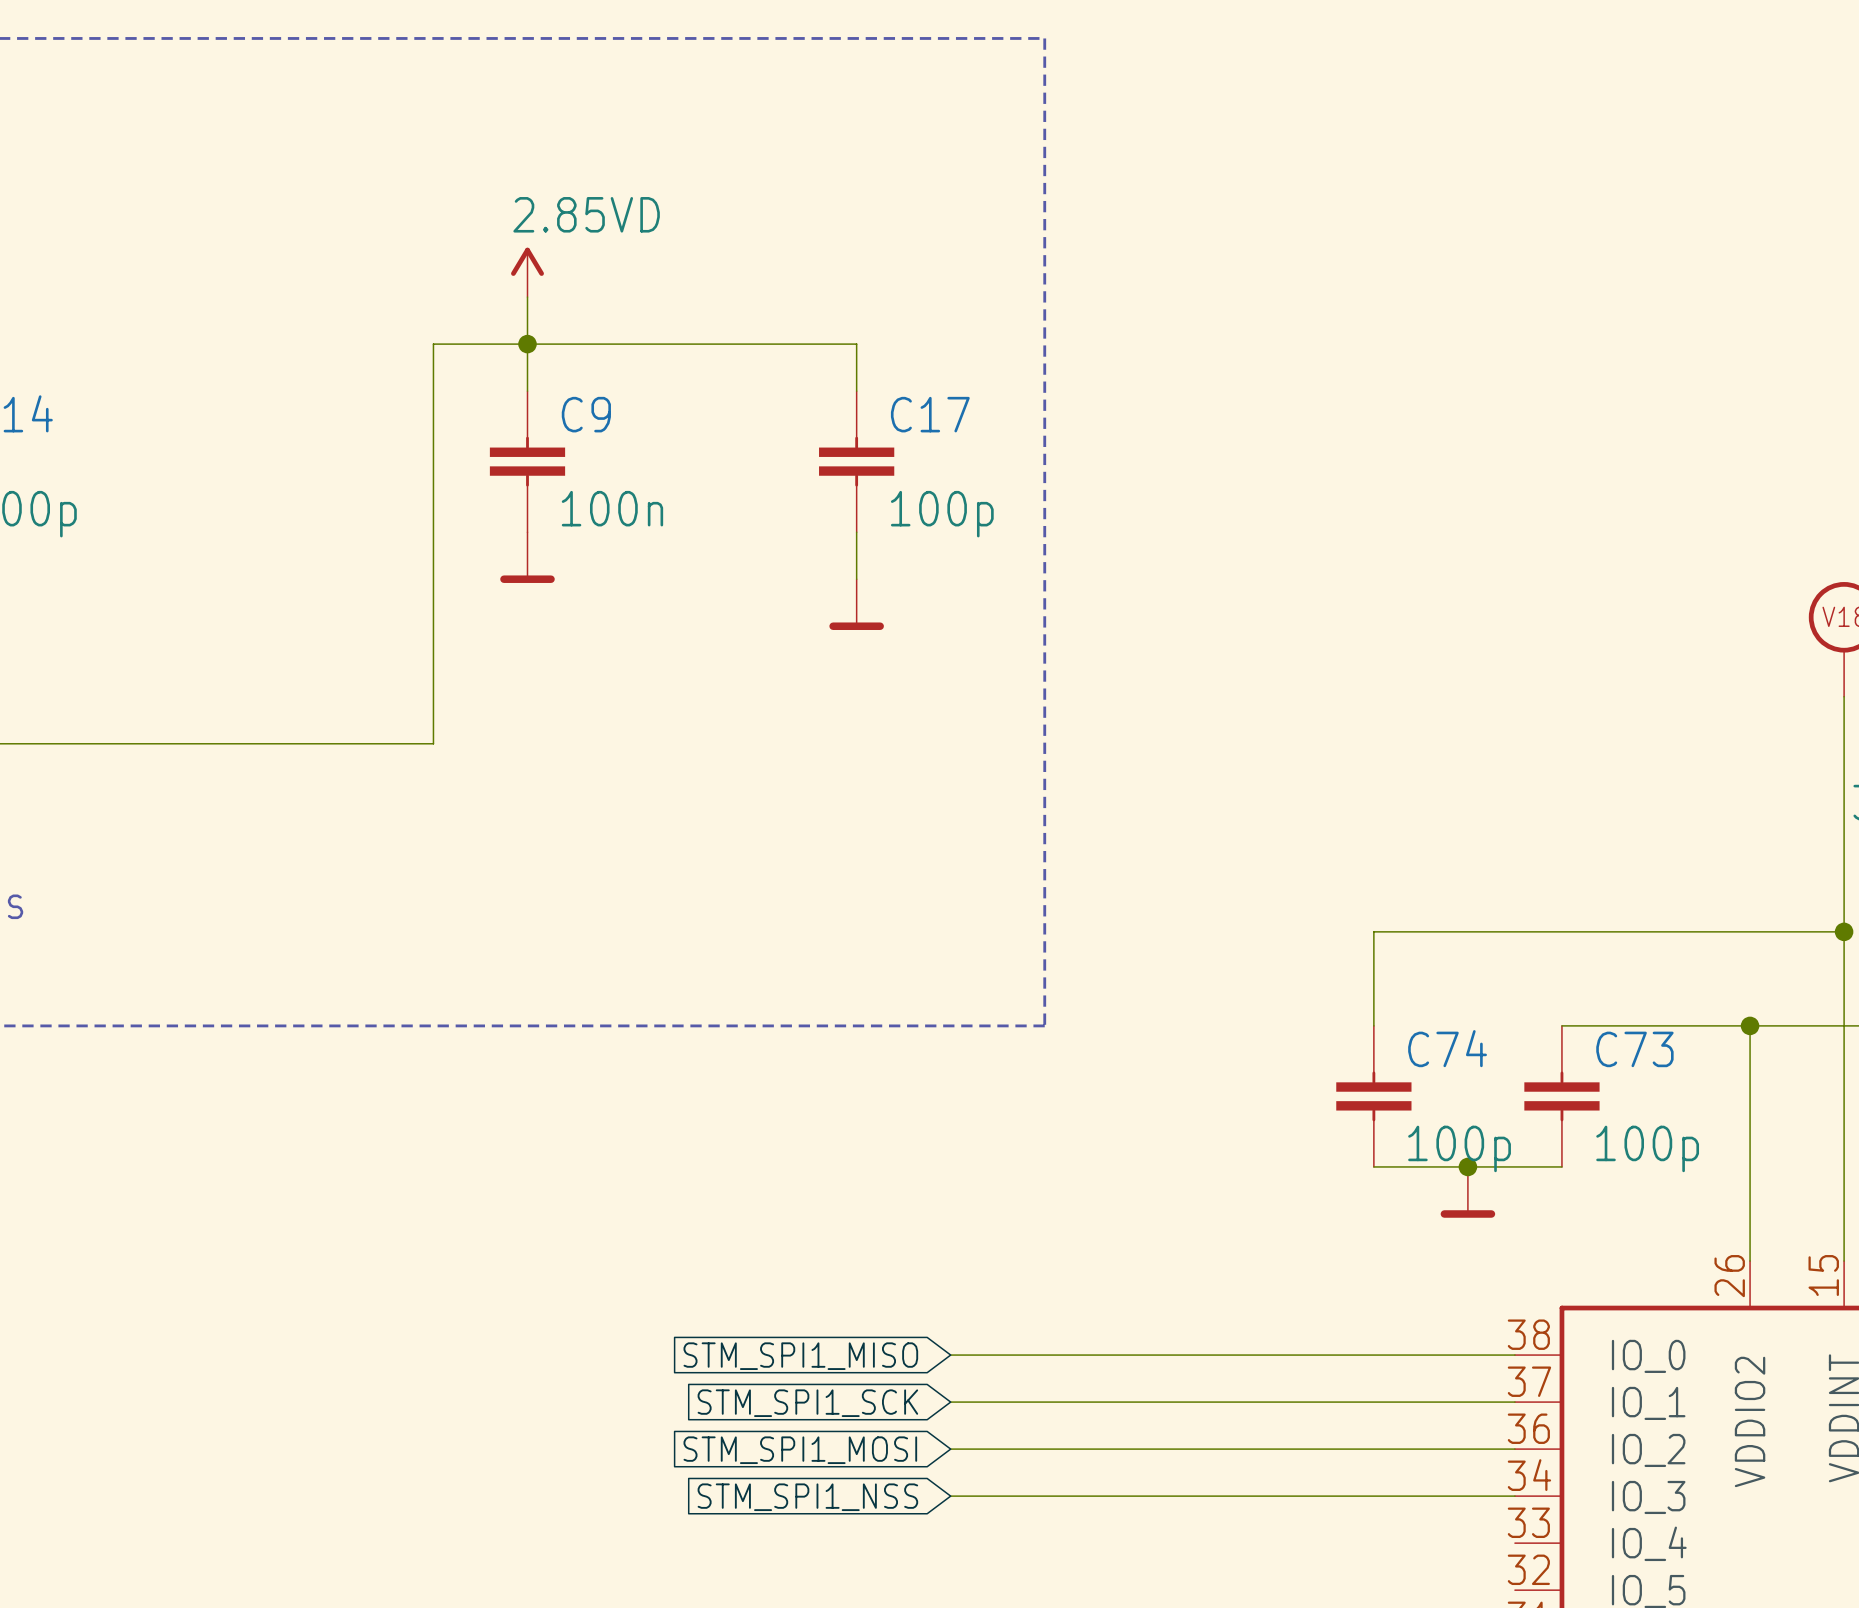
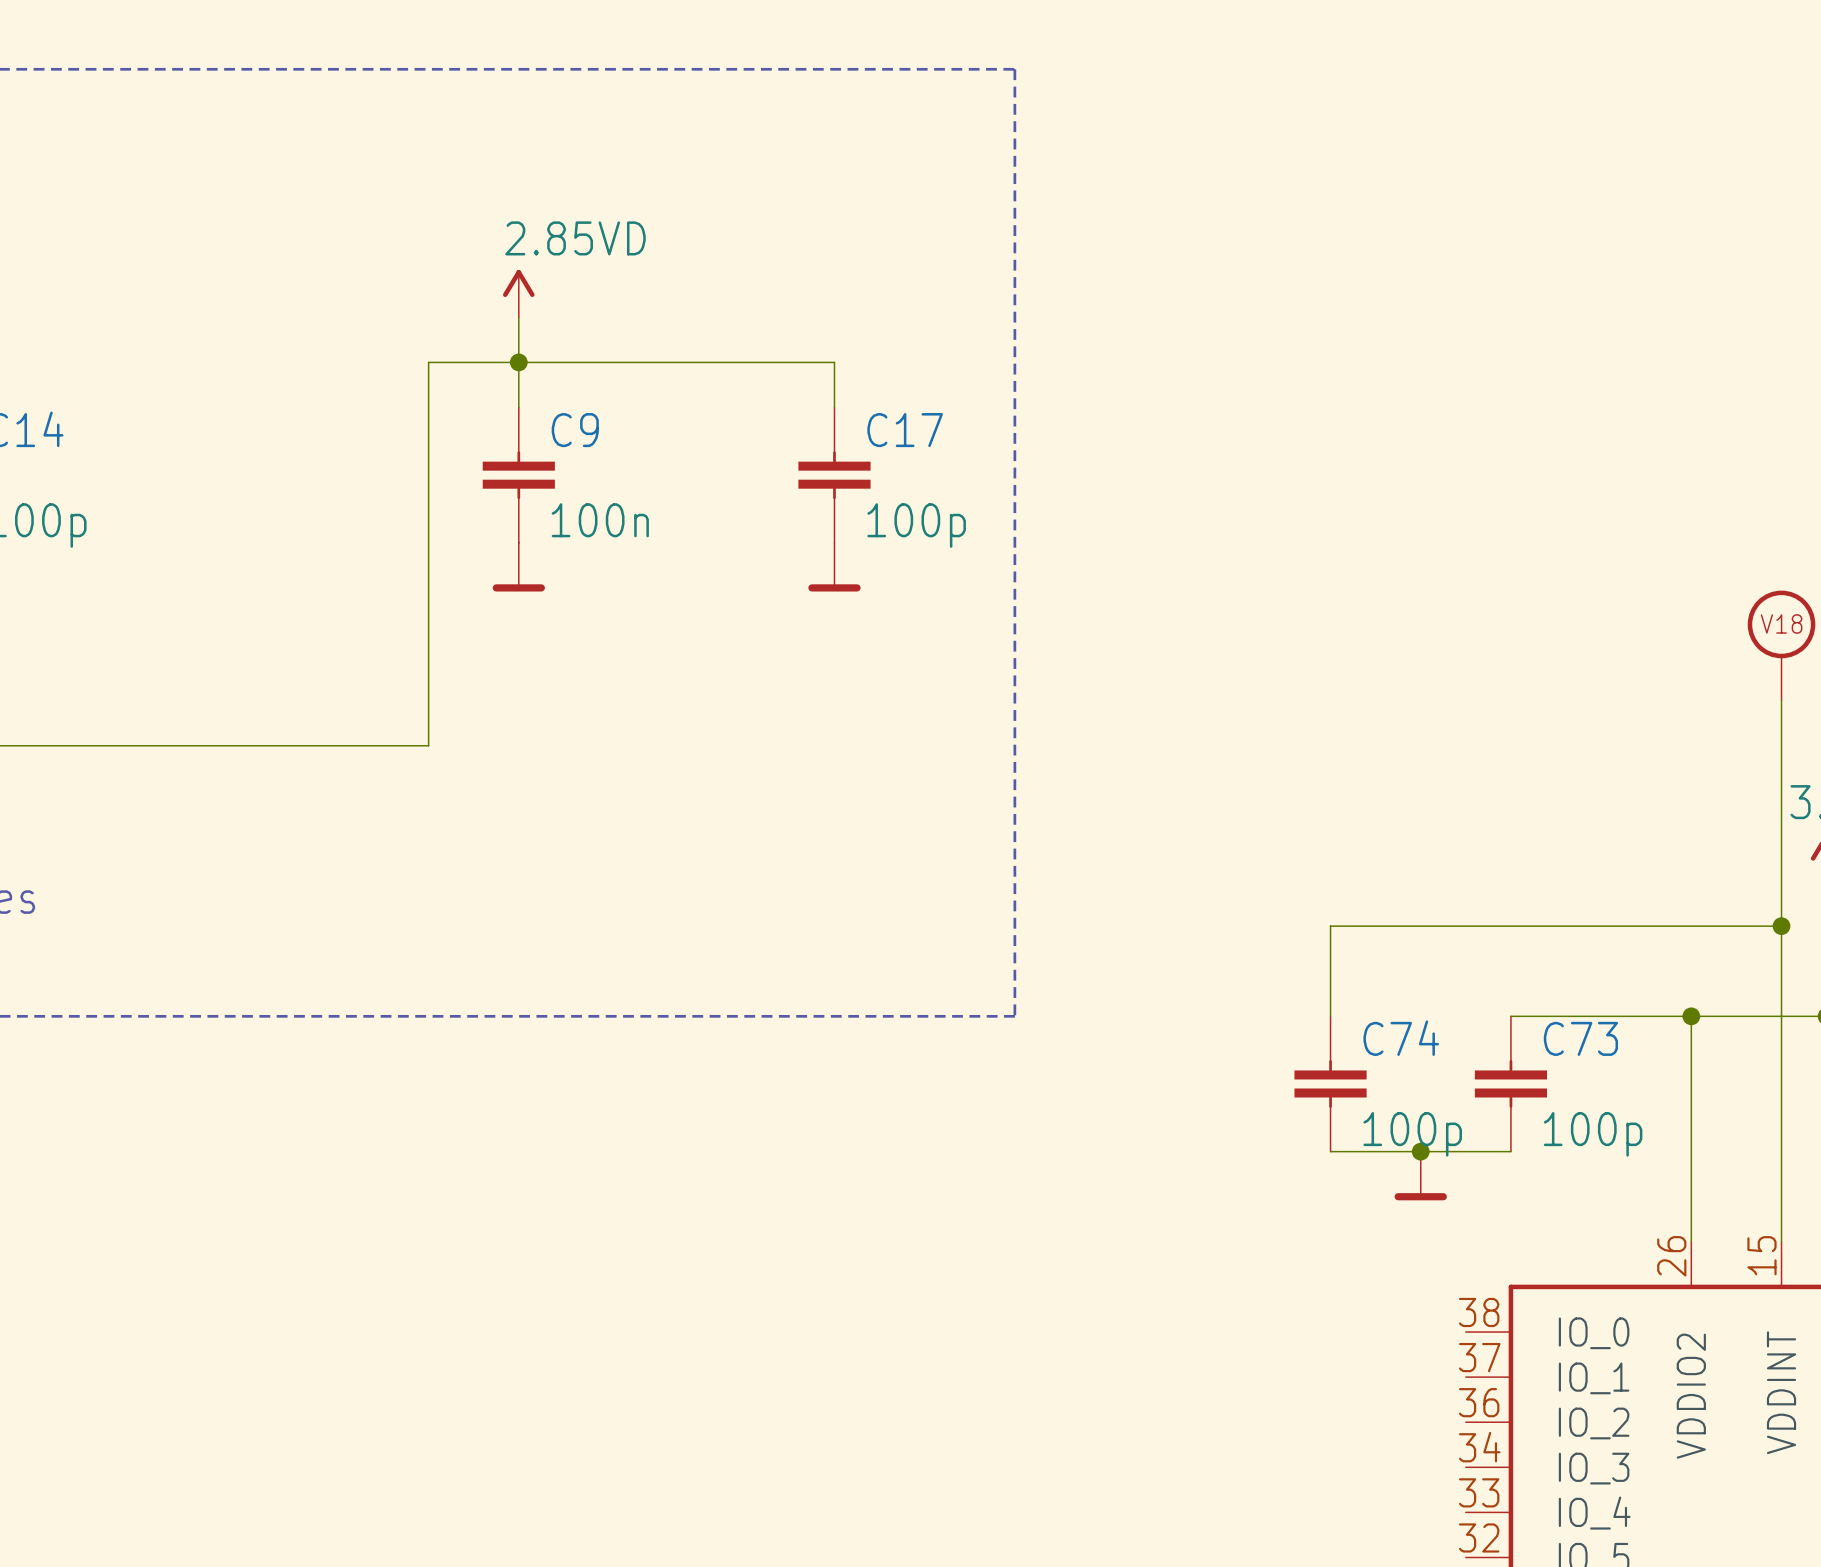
power symbol position: (856, 604) -> (834, 567)
wire: (950, 1355) (1514, 1355) -> none
global label: STM_SPI1_MISO (800, 1356) -> none
wire: (950, 1402) (1514, 1402) -> none
global label: STM_SPI1_SCK (807, 1403) -> none
wire: (950, 1449) (1514, 1449) -> none
global label: STM_SPI1_MOSI (800, 1450) -> none
wire: (950, 1496) (1514, 1496) -> none
global label: STM_SPI1_NSS (807, 1497) -> none

